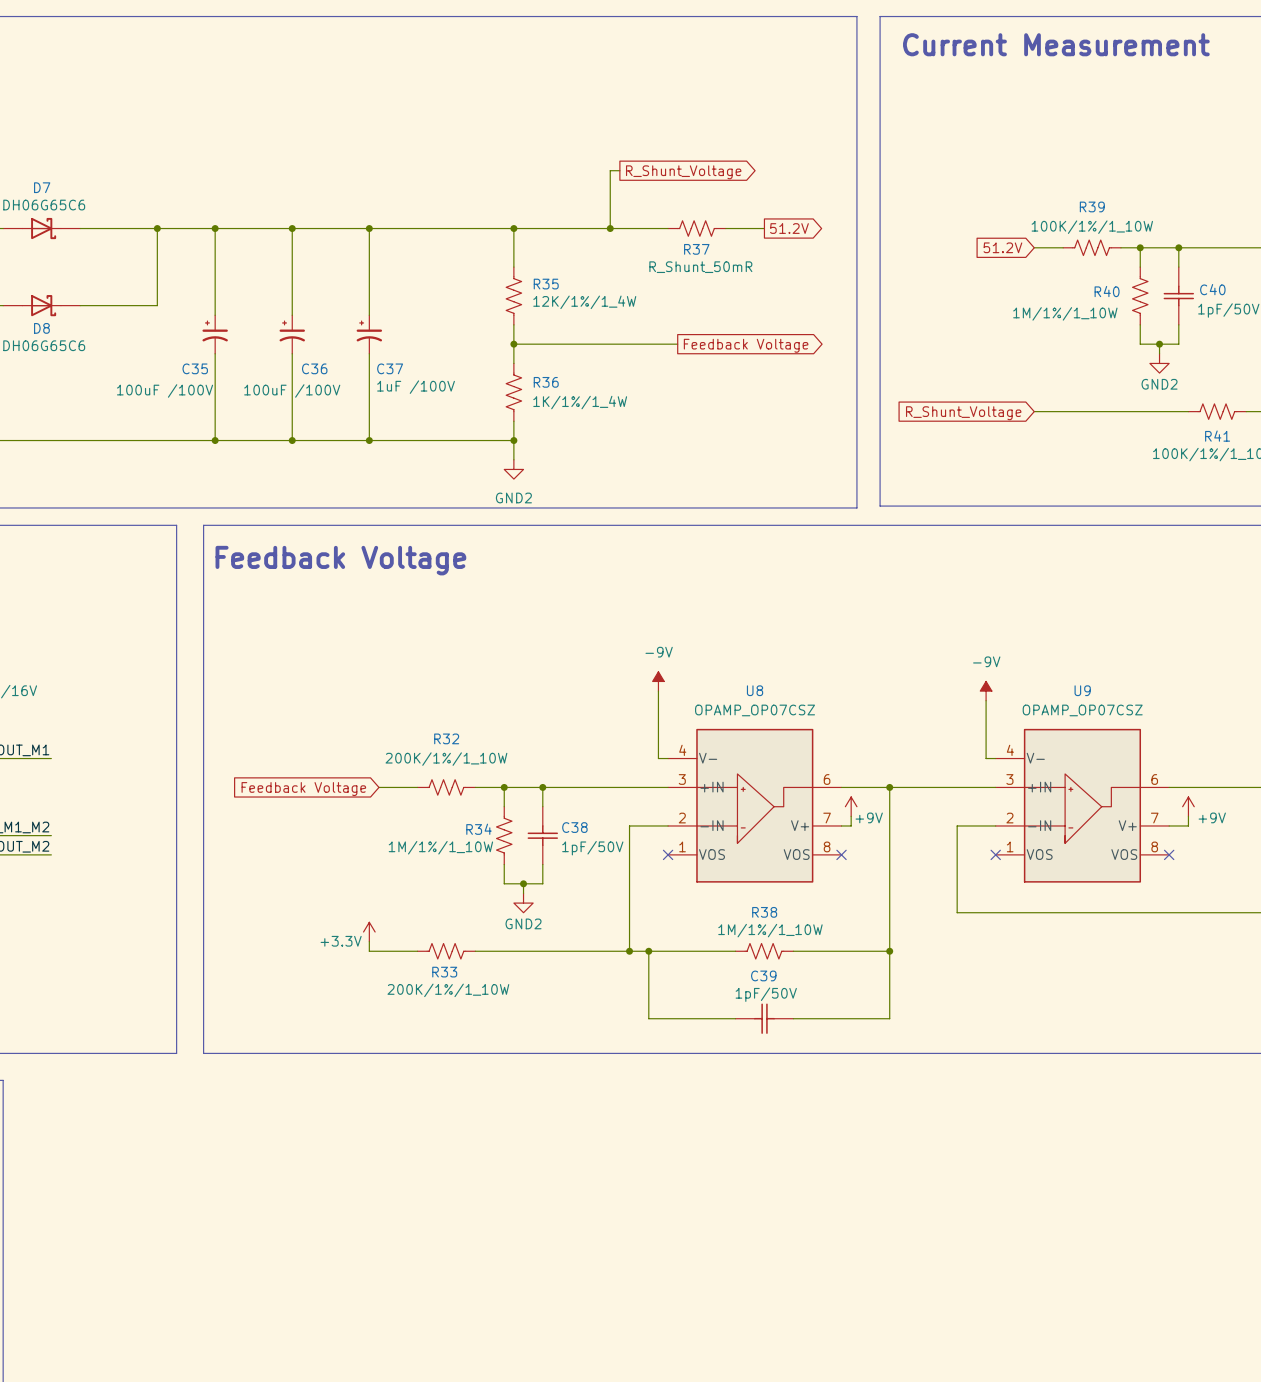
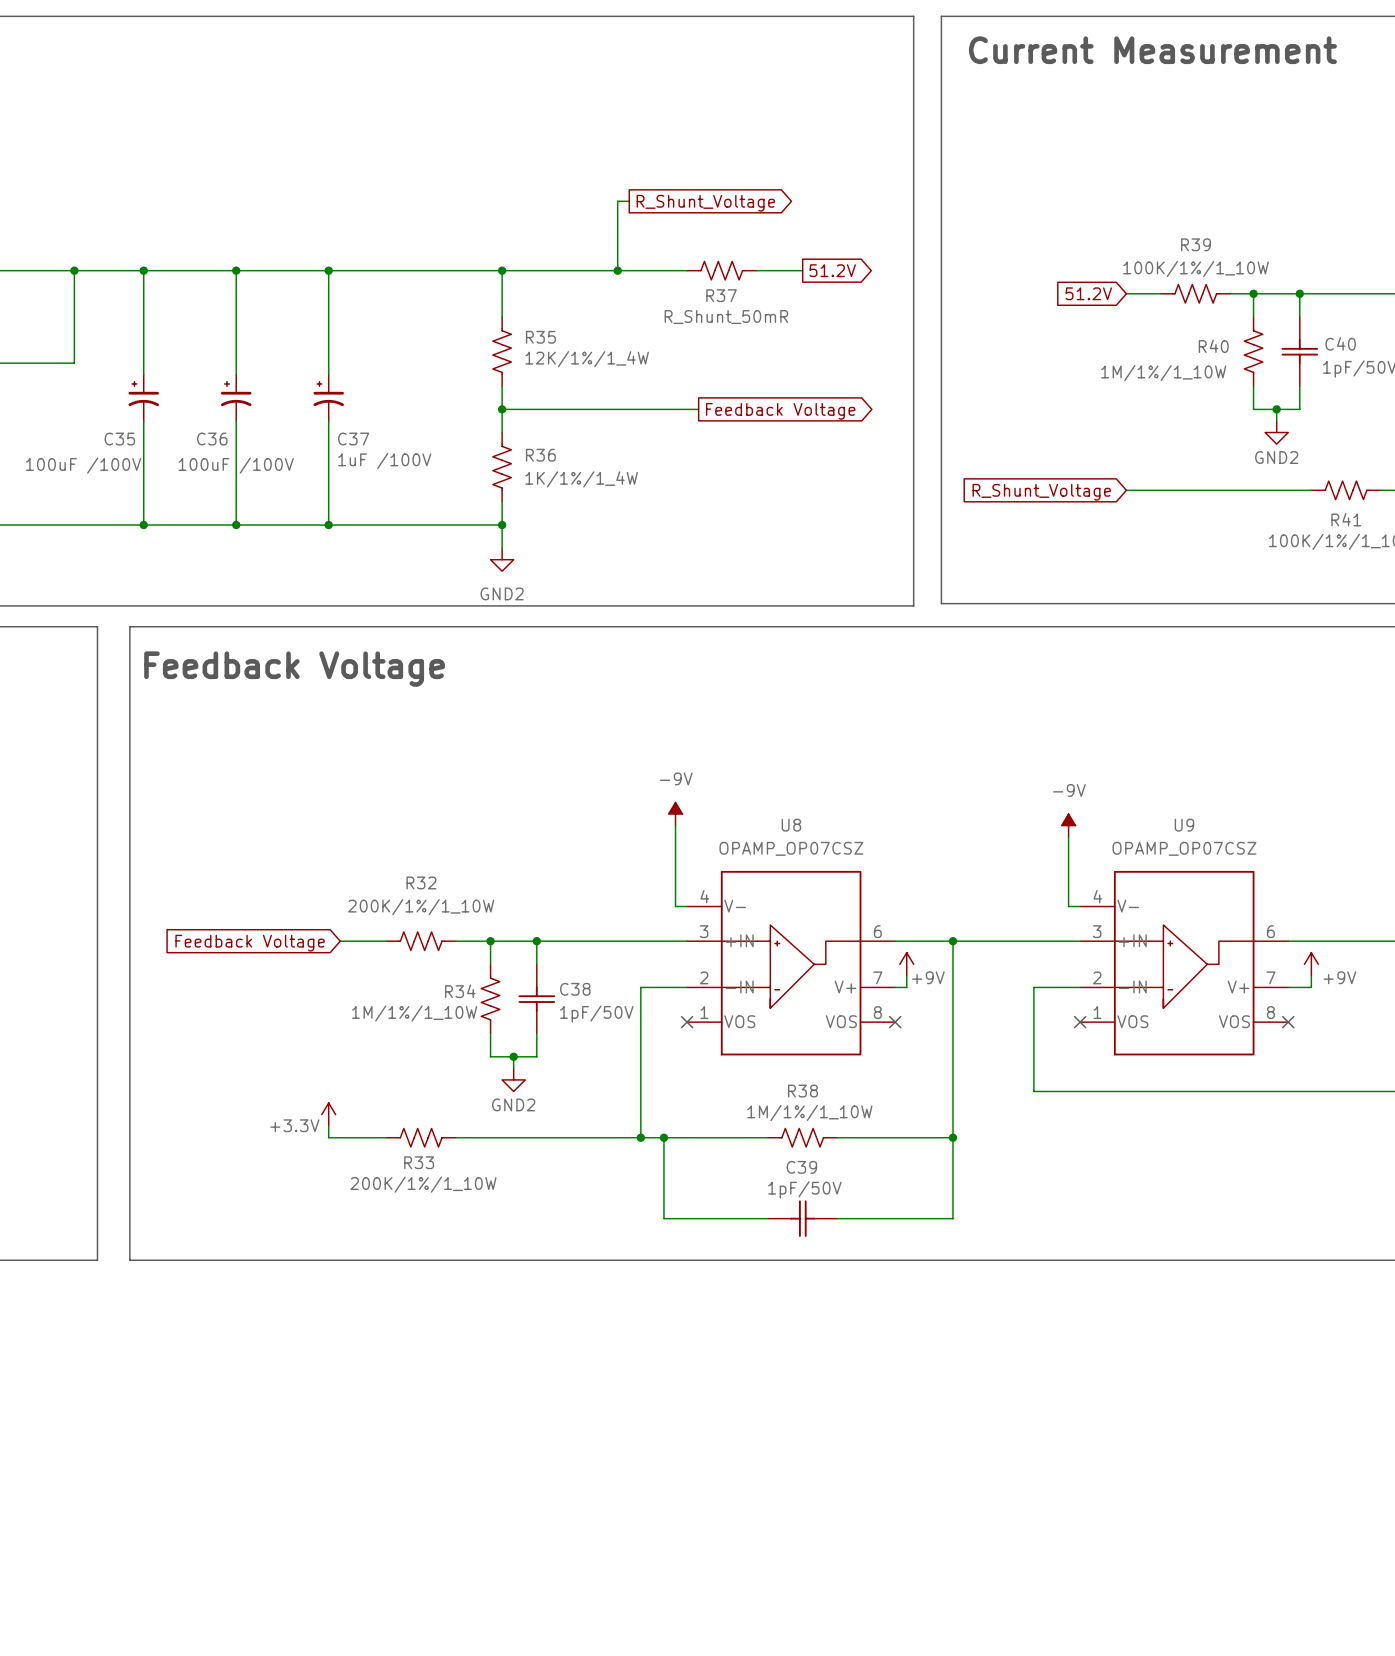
C36 name position: C36 (314, 368) -> C36 (212, 439)

